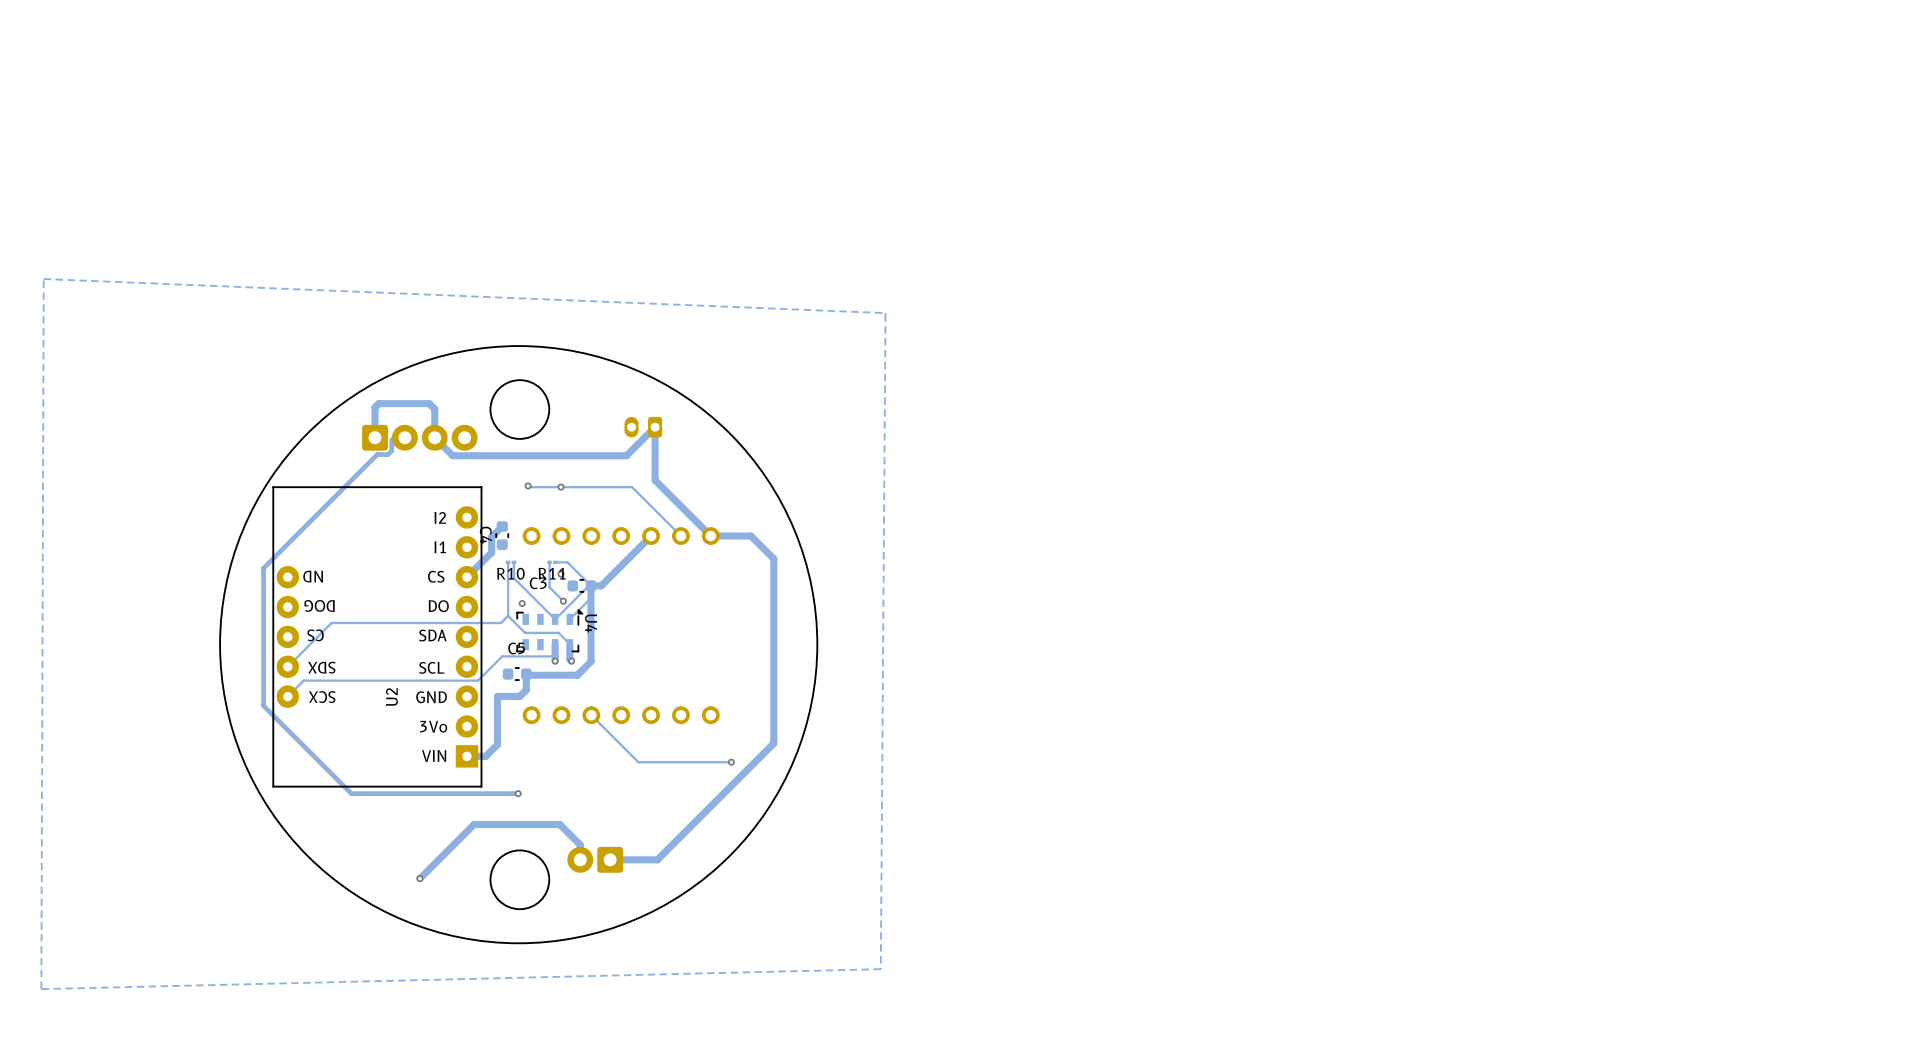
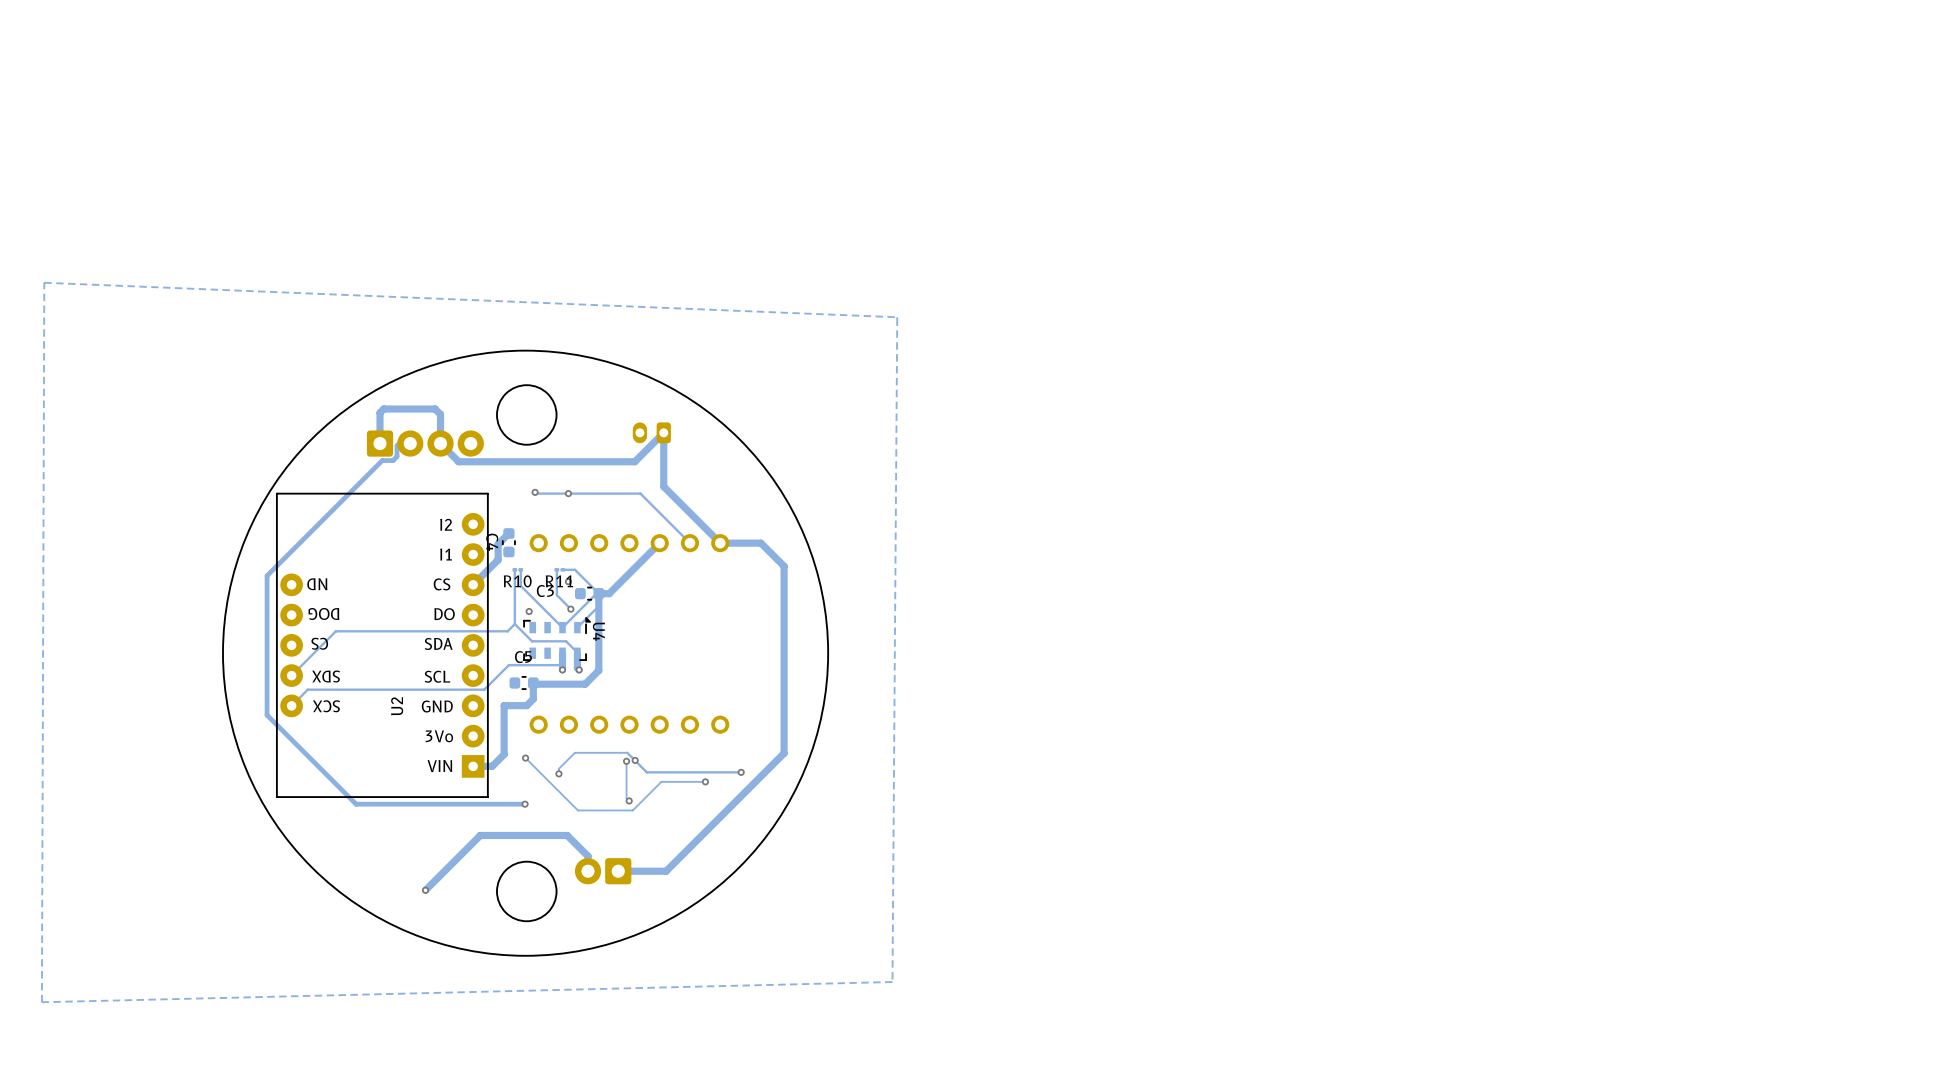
track: (591, 715) (619, 742) -> (558, 773) (558, 768) (574, 752) (627, 752)
track: none -> (525, 758) (577, 810) (632, 810) (661, 781) (705, 781)
via: none -> (525, 758)
via: none -> (635, 760)
track: none -> (626, 761) (626, 798) (629, 800)
via: none -> (626, 761)
via: none -> (558, 773)
via: none -> (705, 781)
via: none -> (629, 800)

